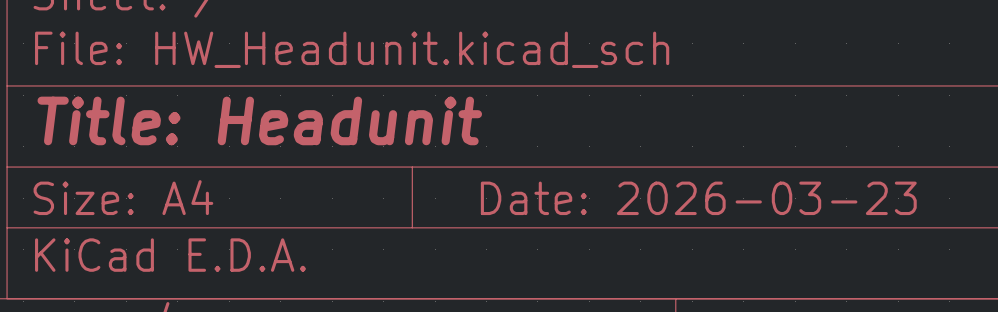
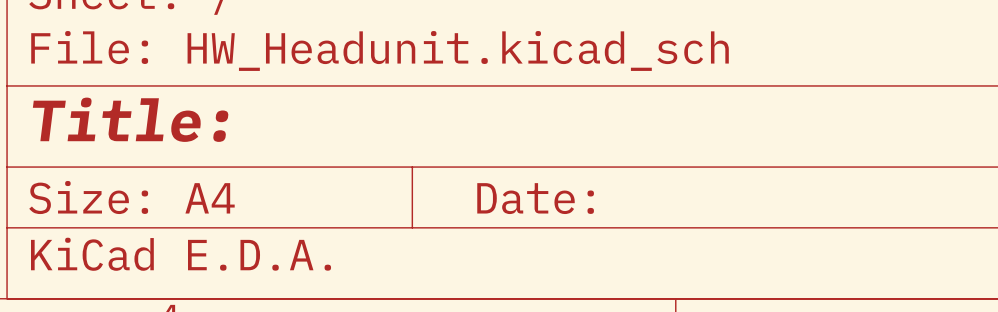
title block: Title: Headunit (259, 120) -> Title: (130, 119)
title block: Date: 2026-03-23 (698, 198) -> Date: (535, 198)

